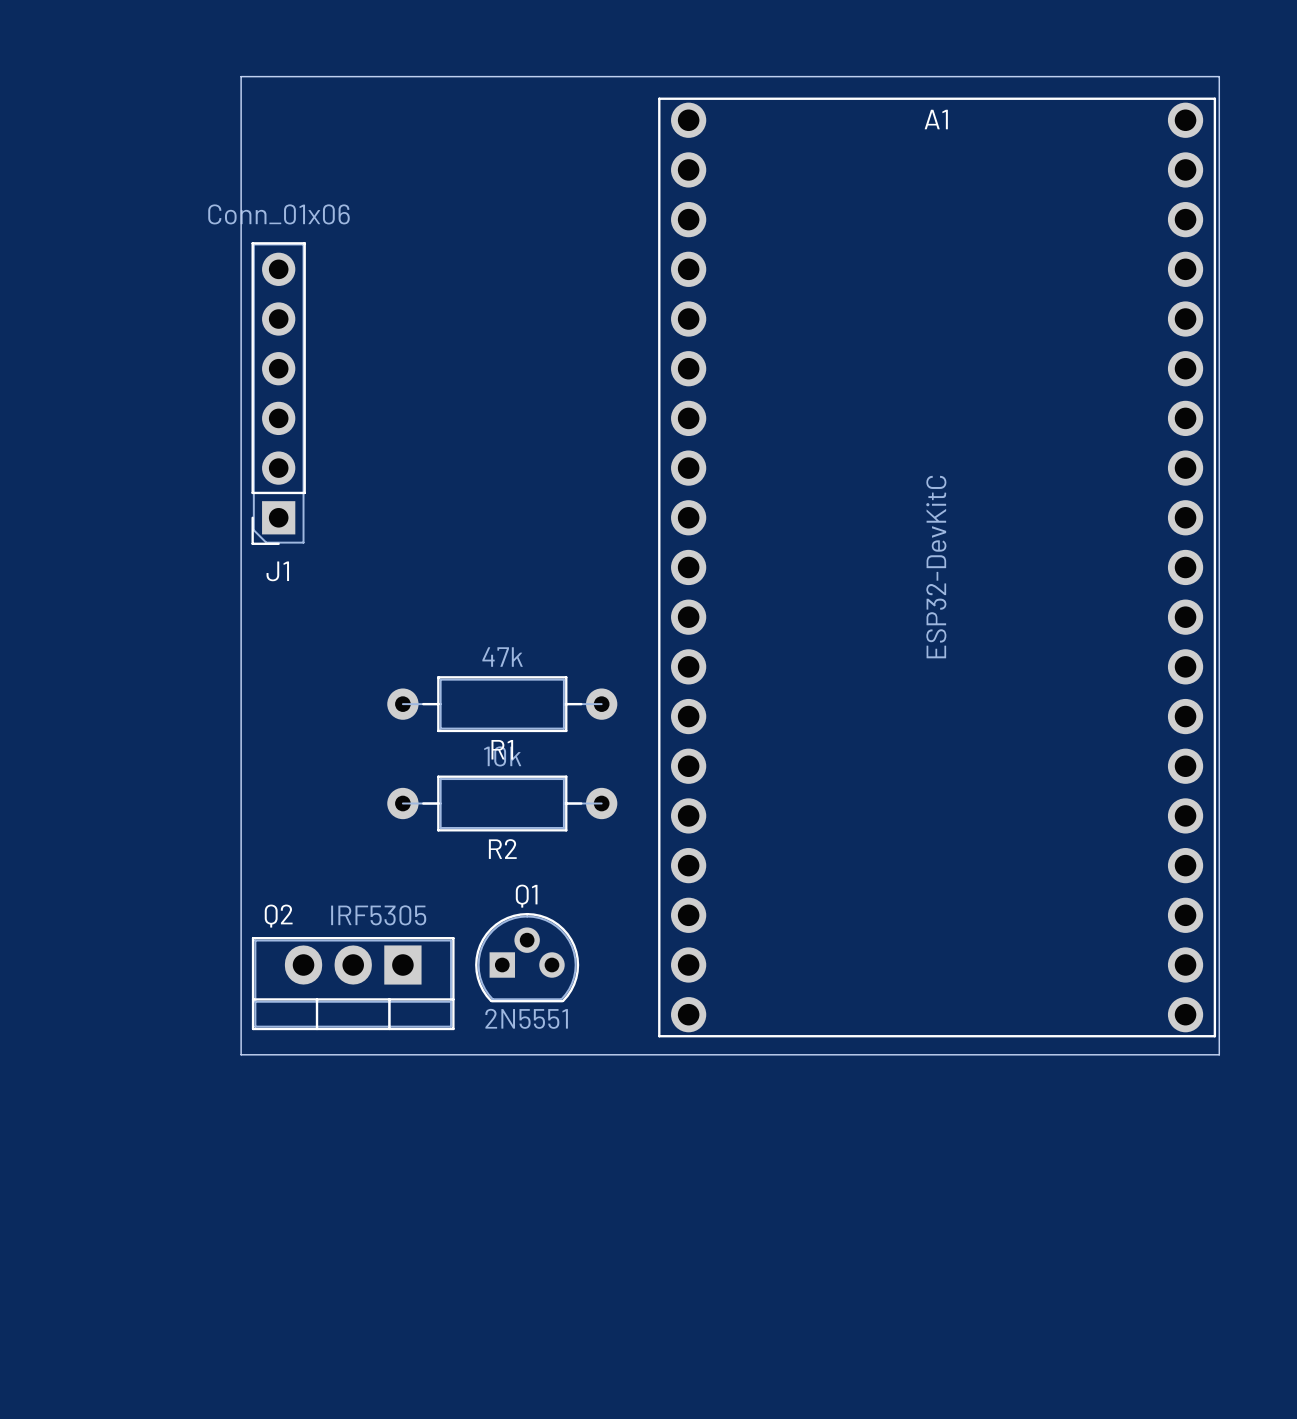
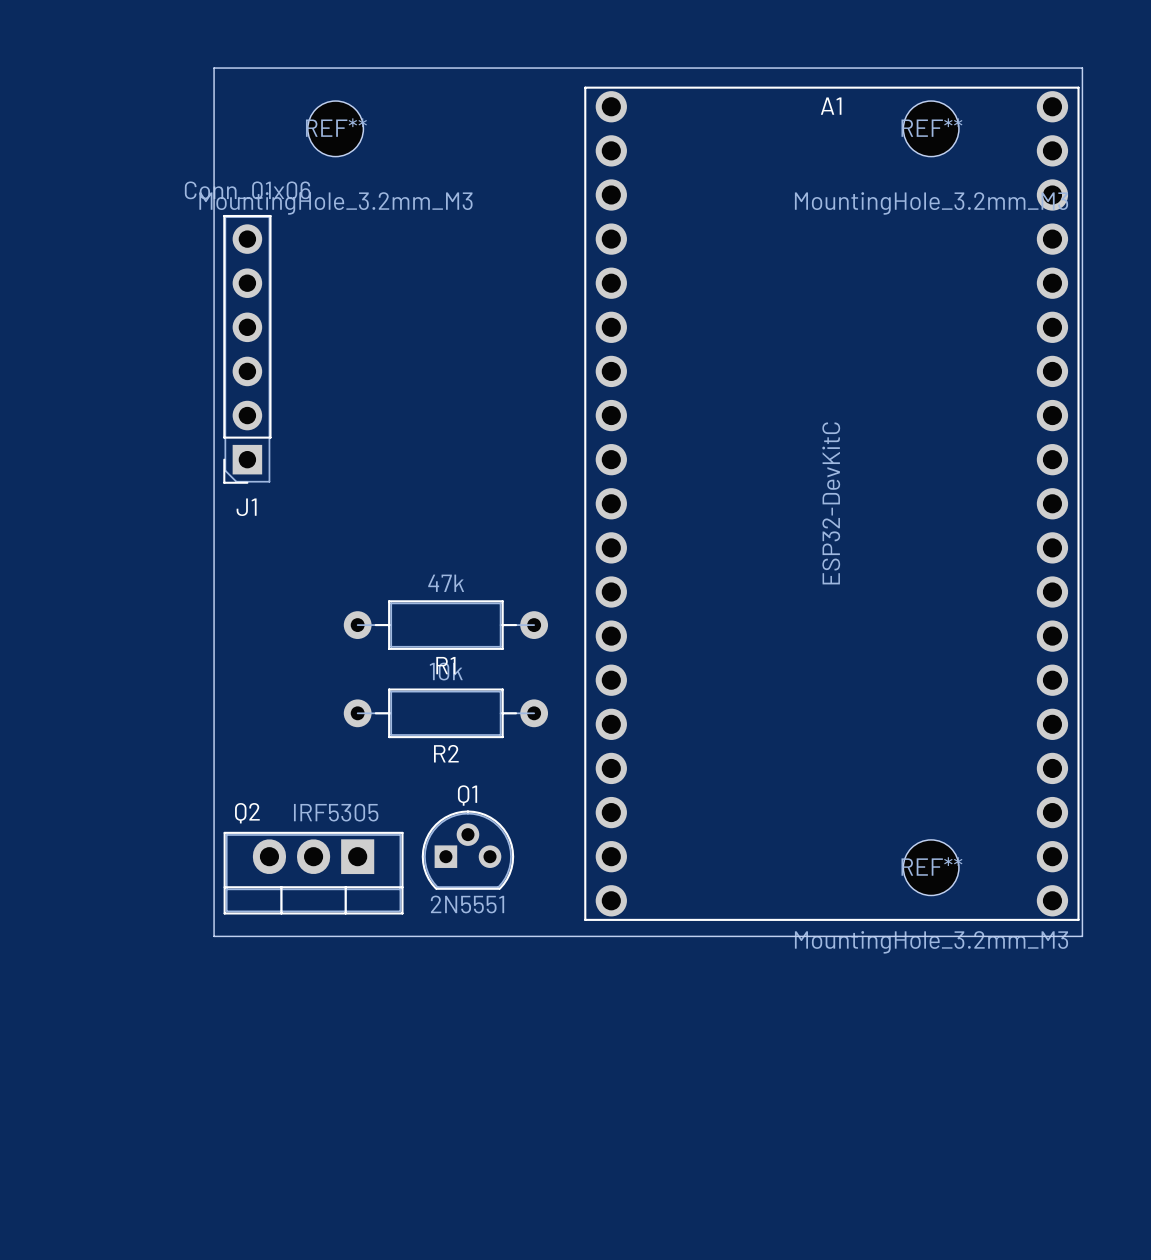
REF**: none -> MountingHole_3.2mm_M3 (335, 128)
REF**: none -> MountingHole_3.2mm_M3 (931, 128)
REF**: none -> MountingHole_3.2mm_M3 (931, 867)

